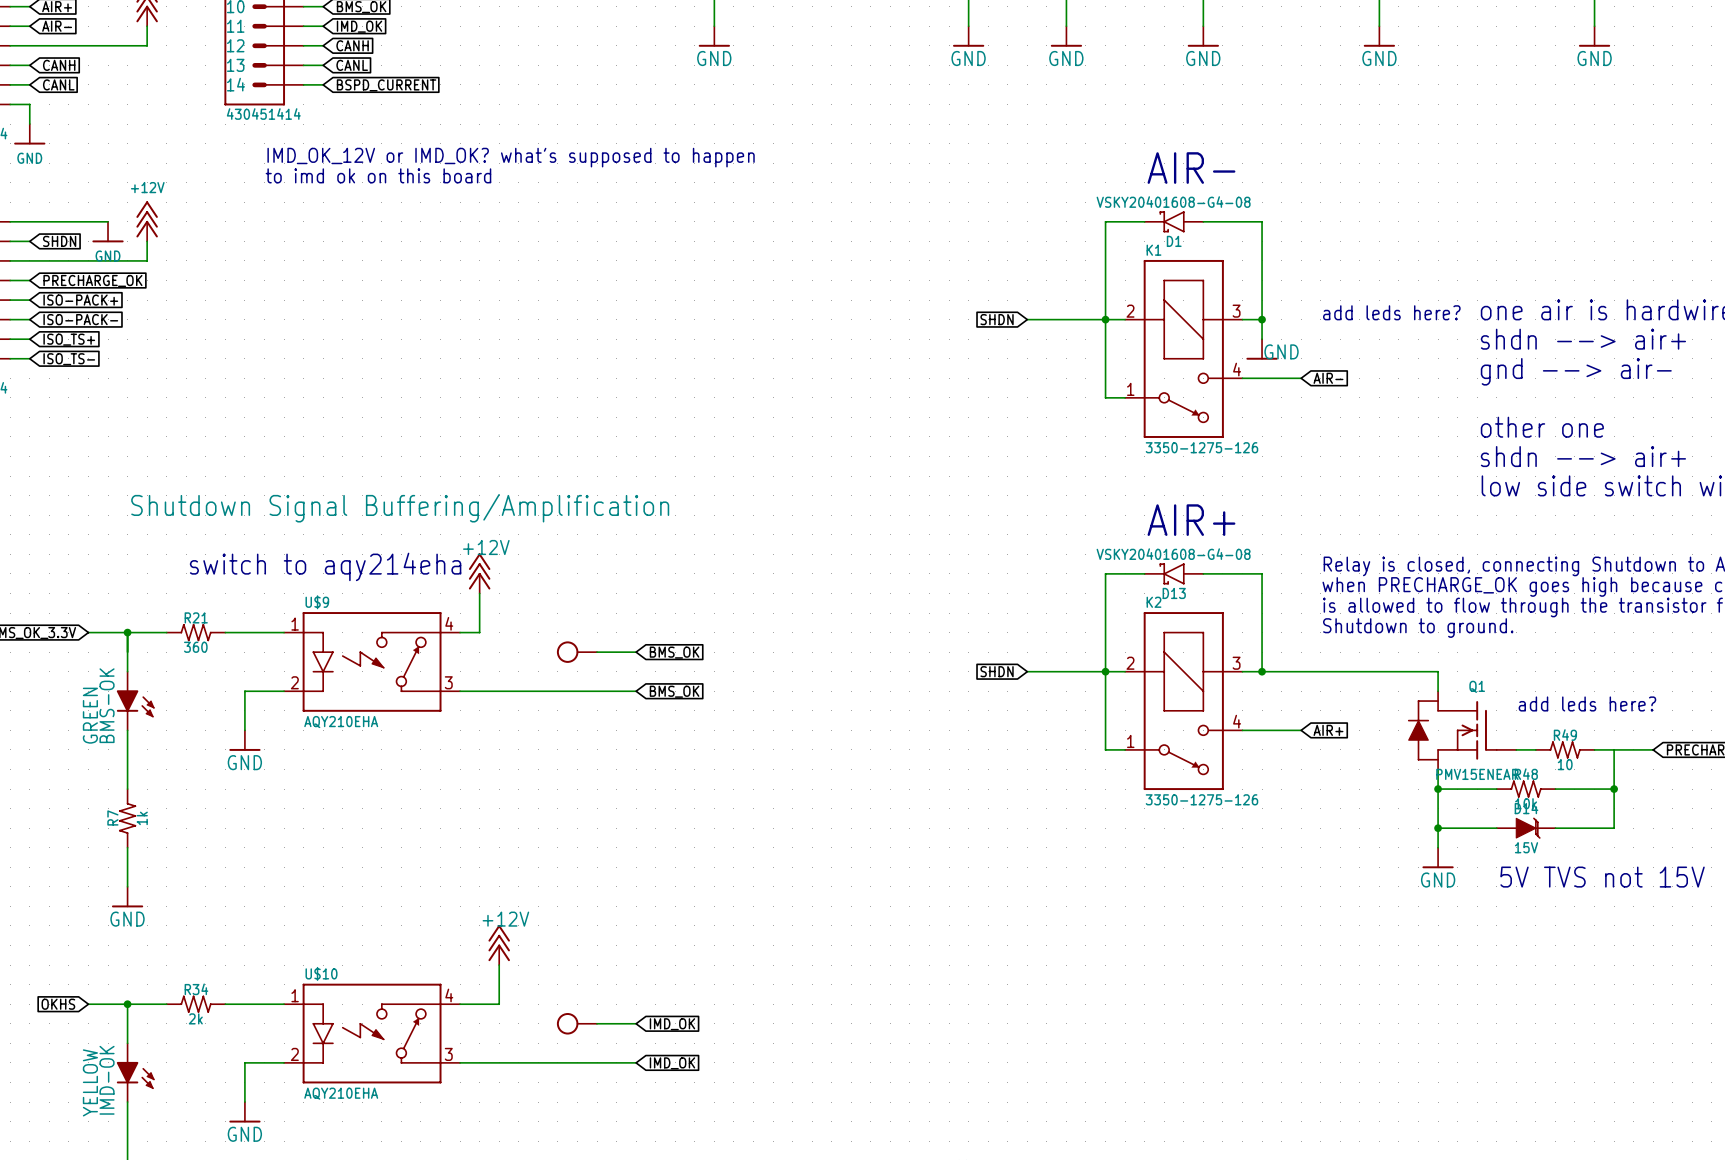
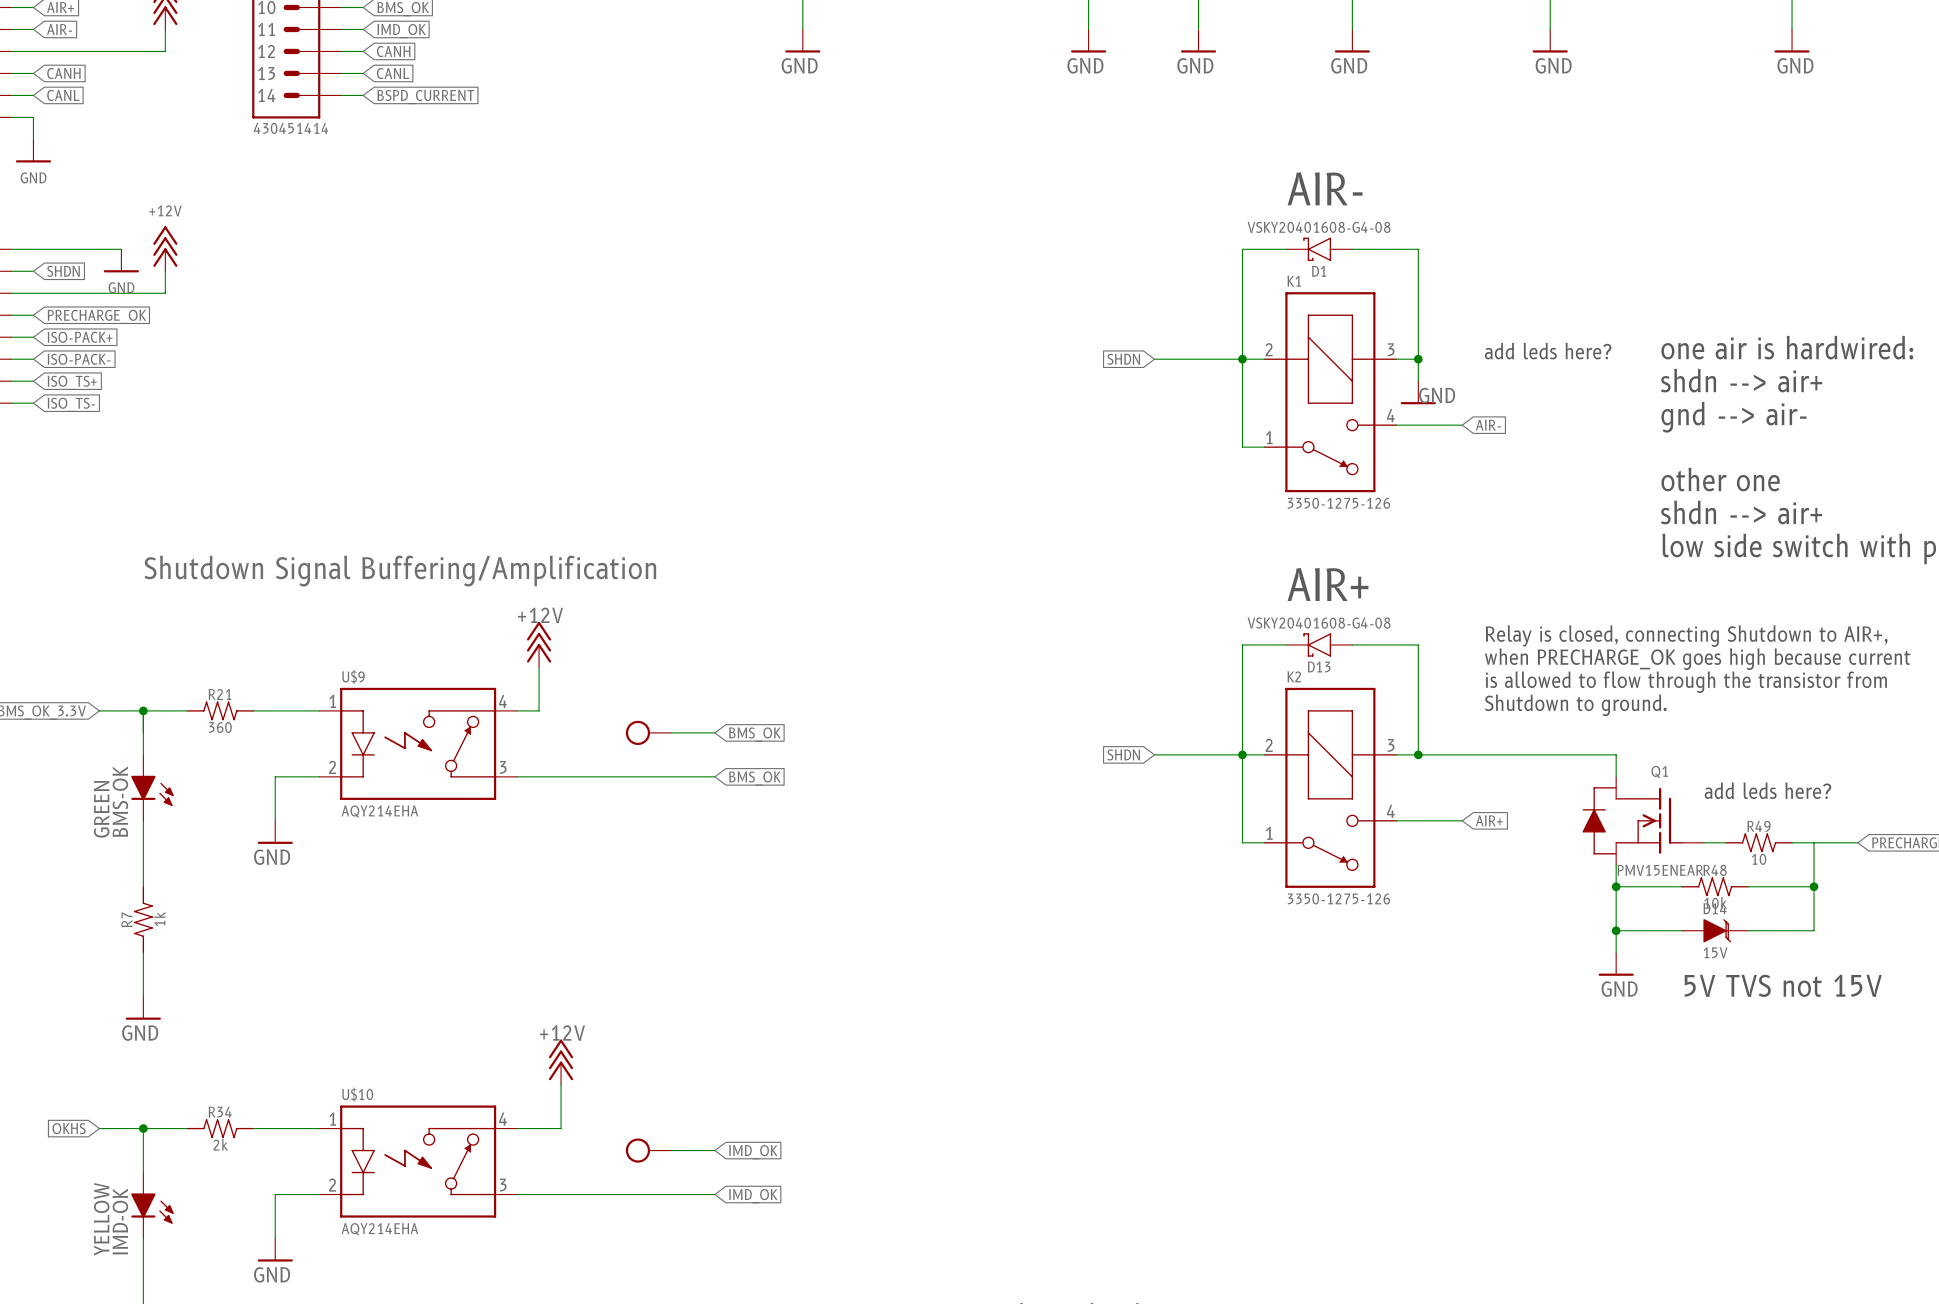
text: IMD_OK_12V or IMD_OK? what's supposed to happen (511, 157) -> none
text: to imd ok on this board (378, 175) -> none
text: switch to aqy214eha (325, 566) -> none
U$9 text: AQY210EHA (341, 722) -> AQY214EHA (379, 811)
U$10 text: AQY210EHA (341, 1093) -> AQY214EHA (379, 1229)

